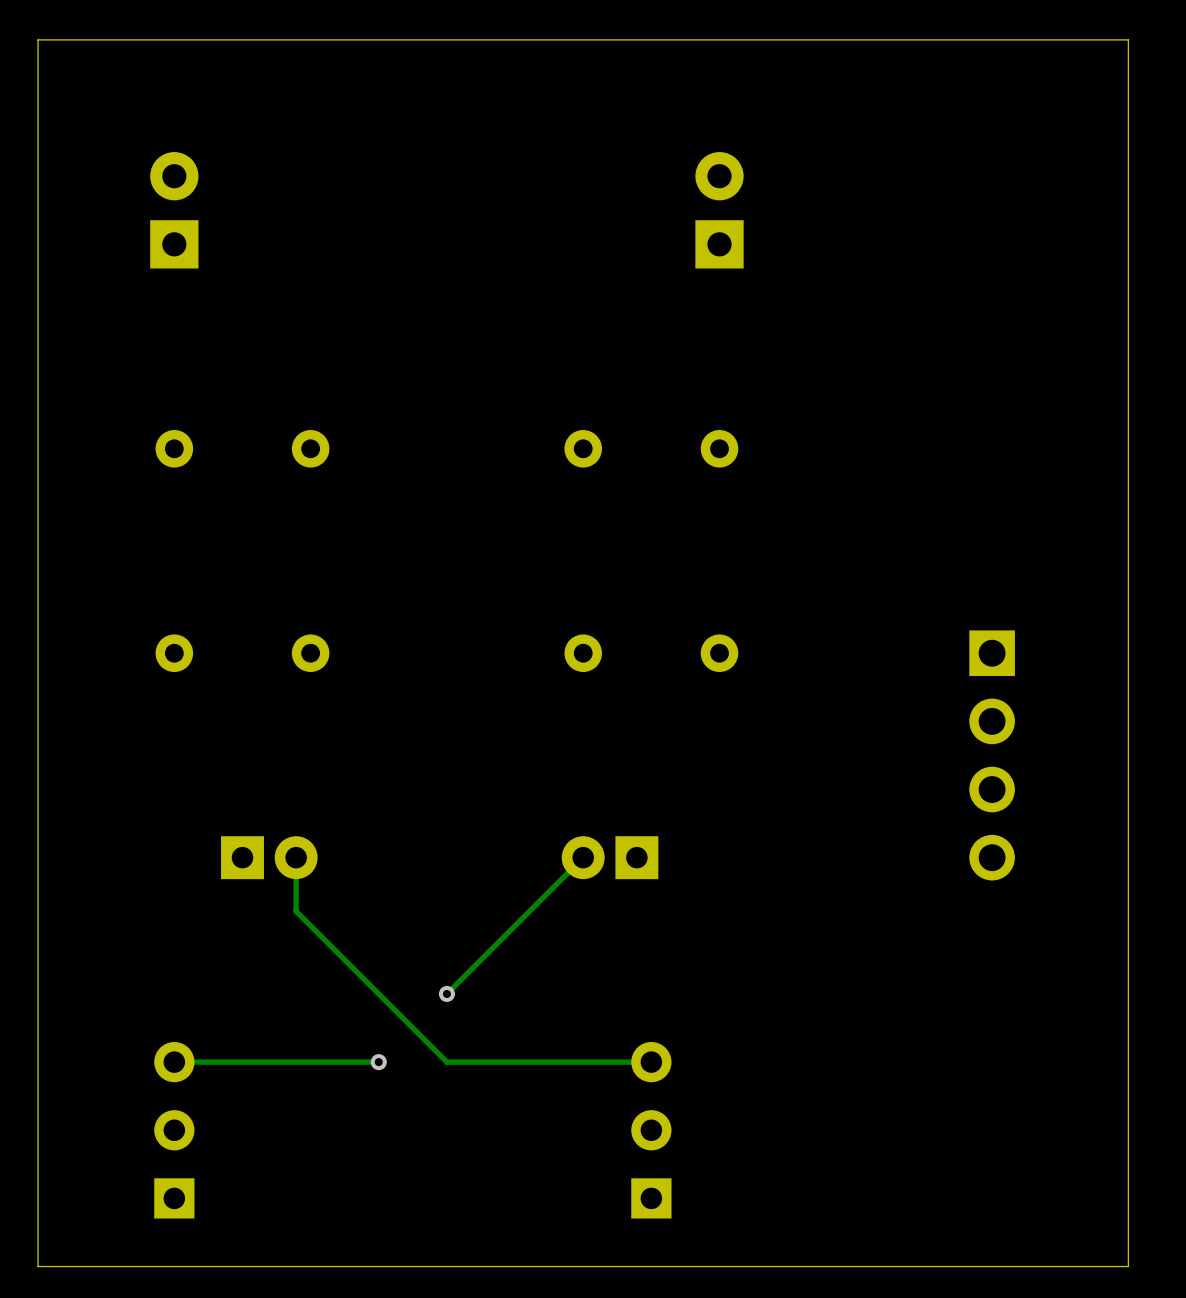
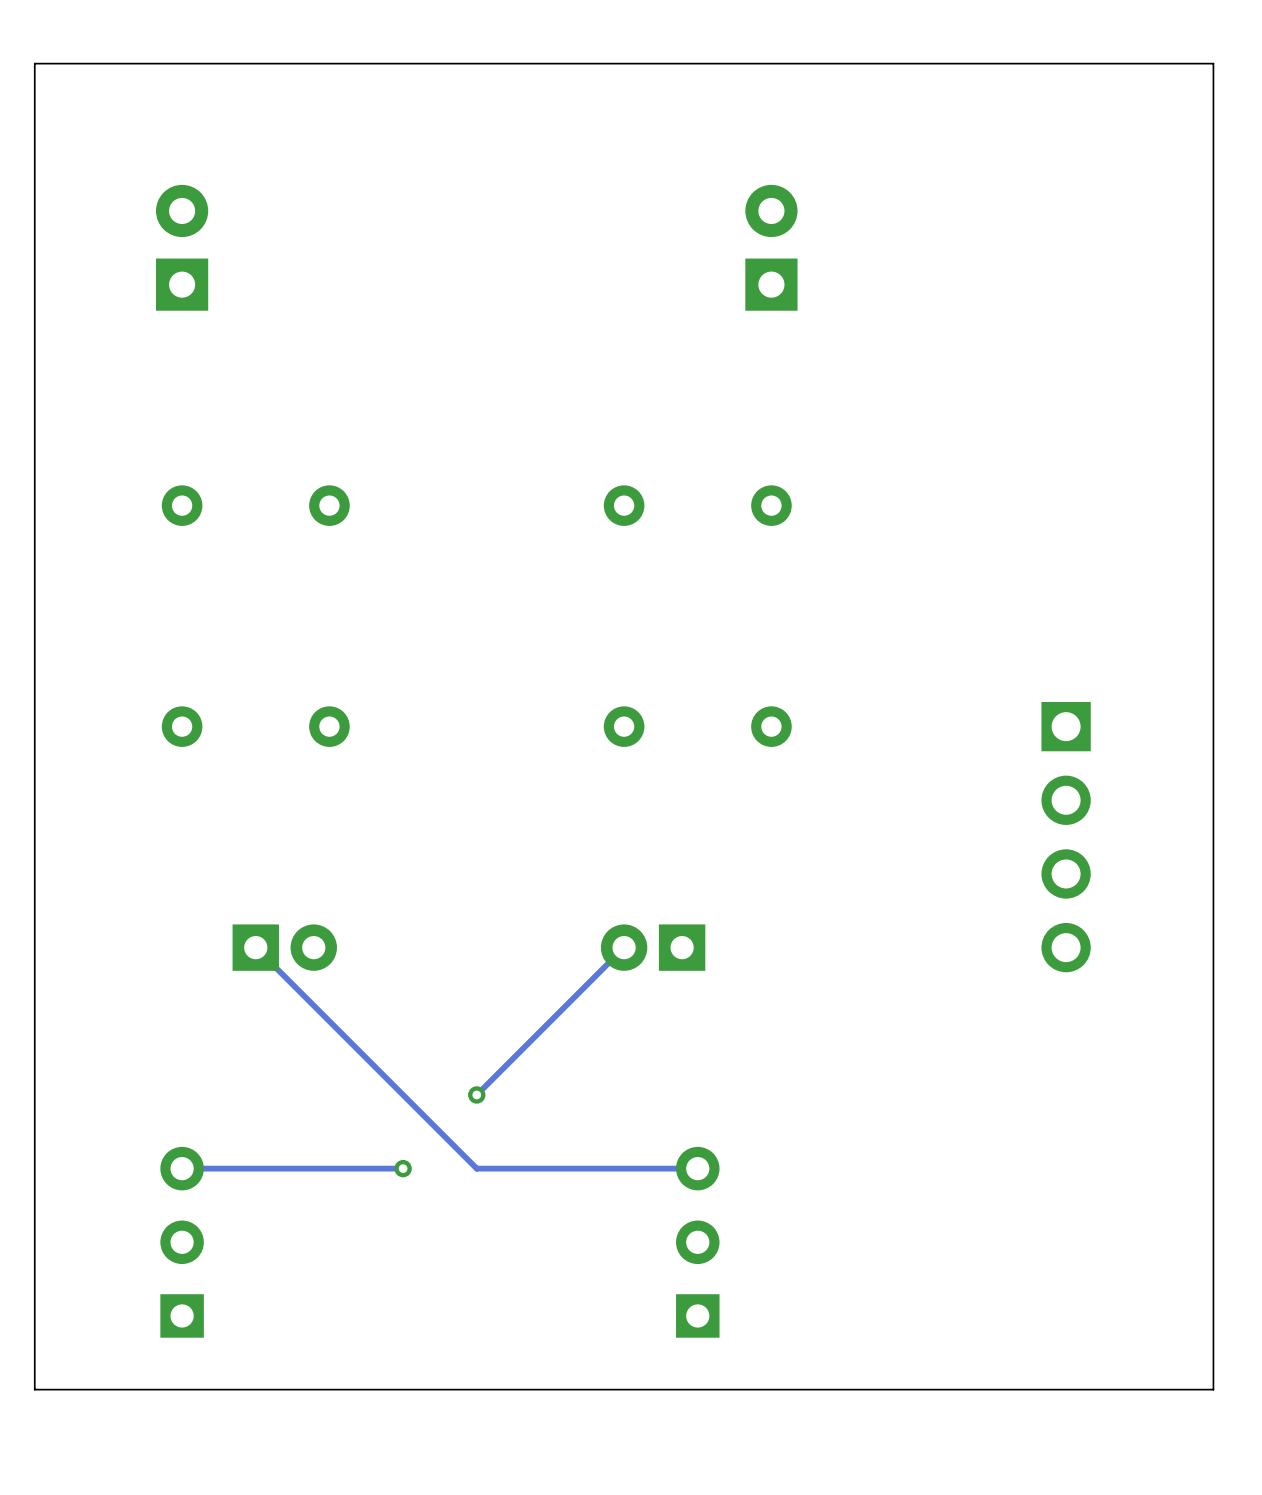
track: (296, 857) (296, 911) -> (255, 947) (313, 1005)

